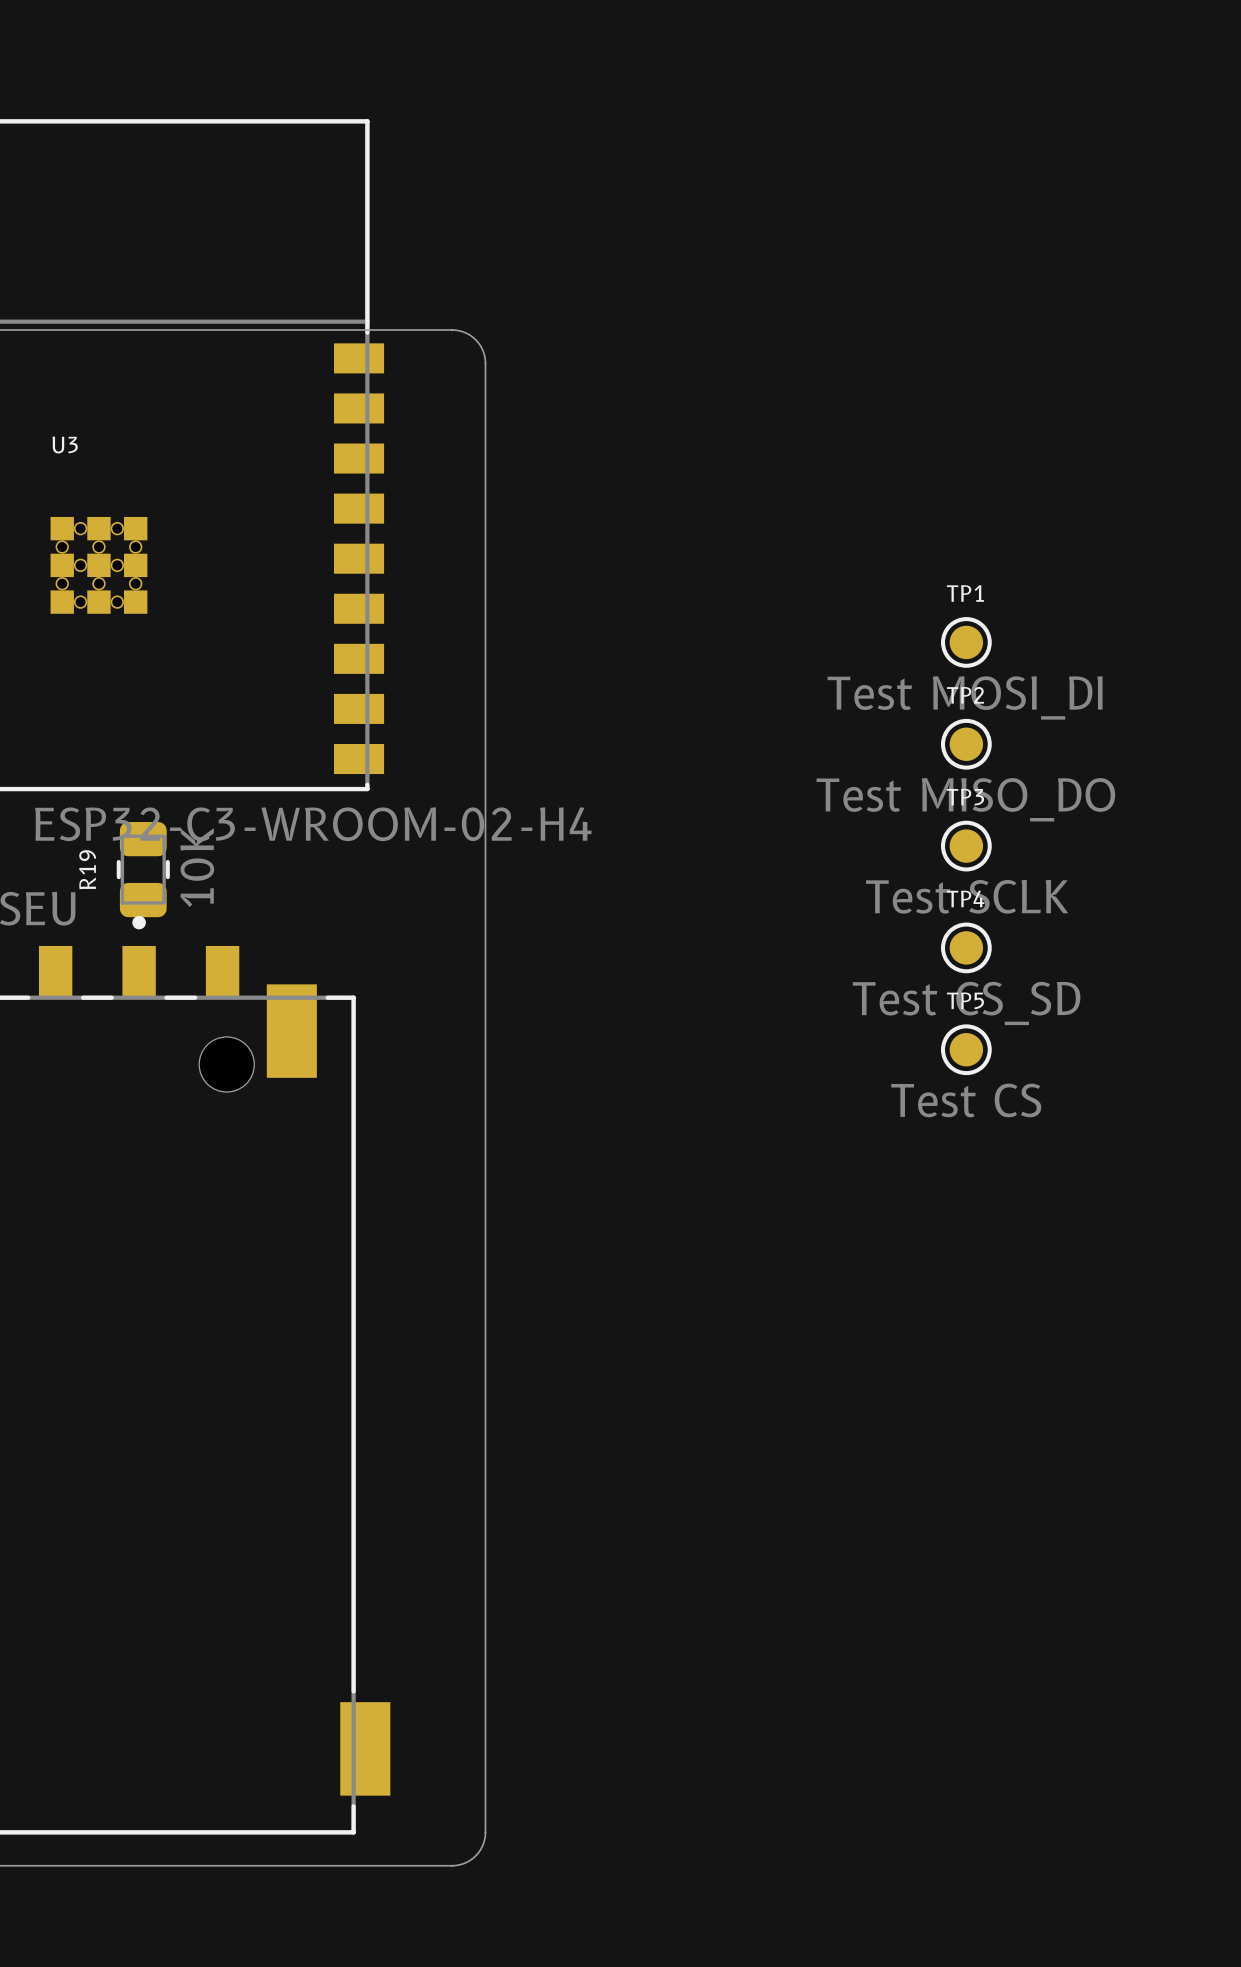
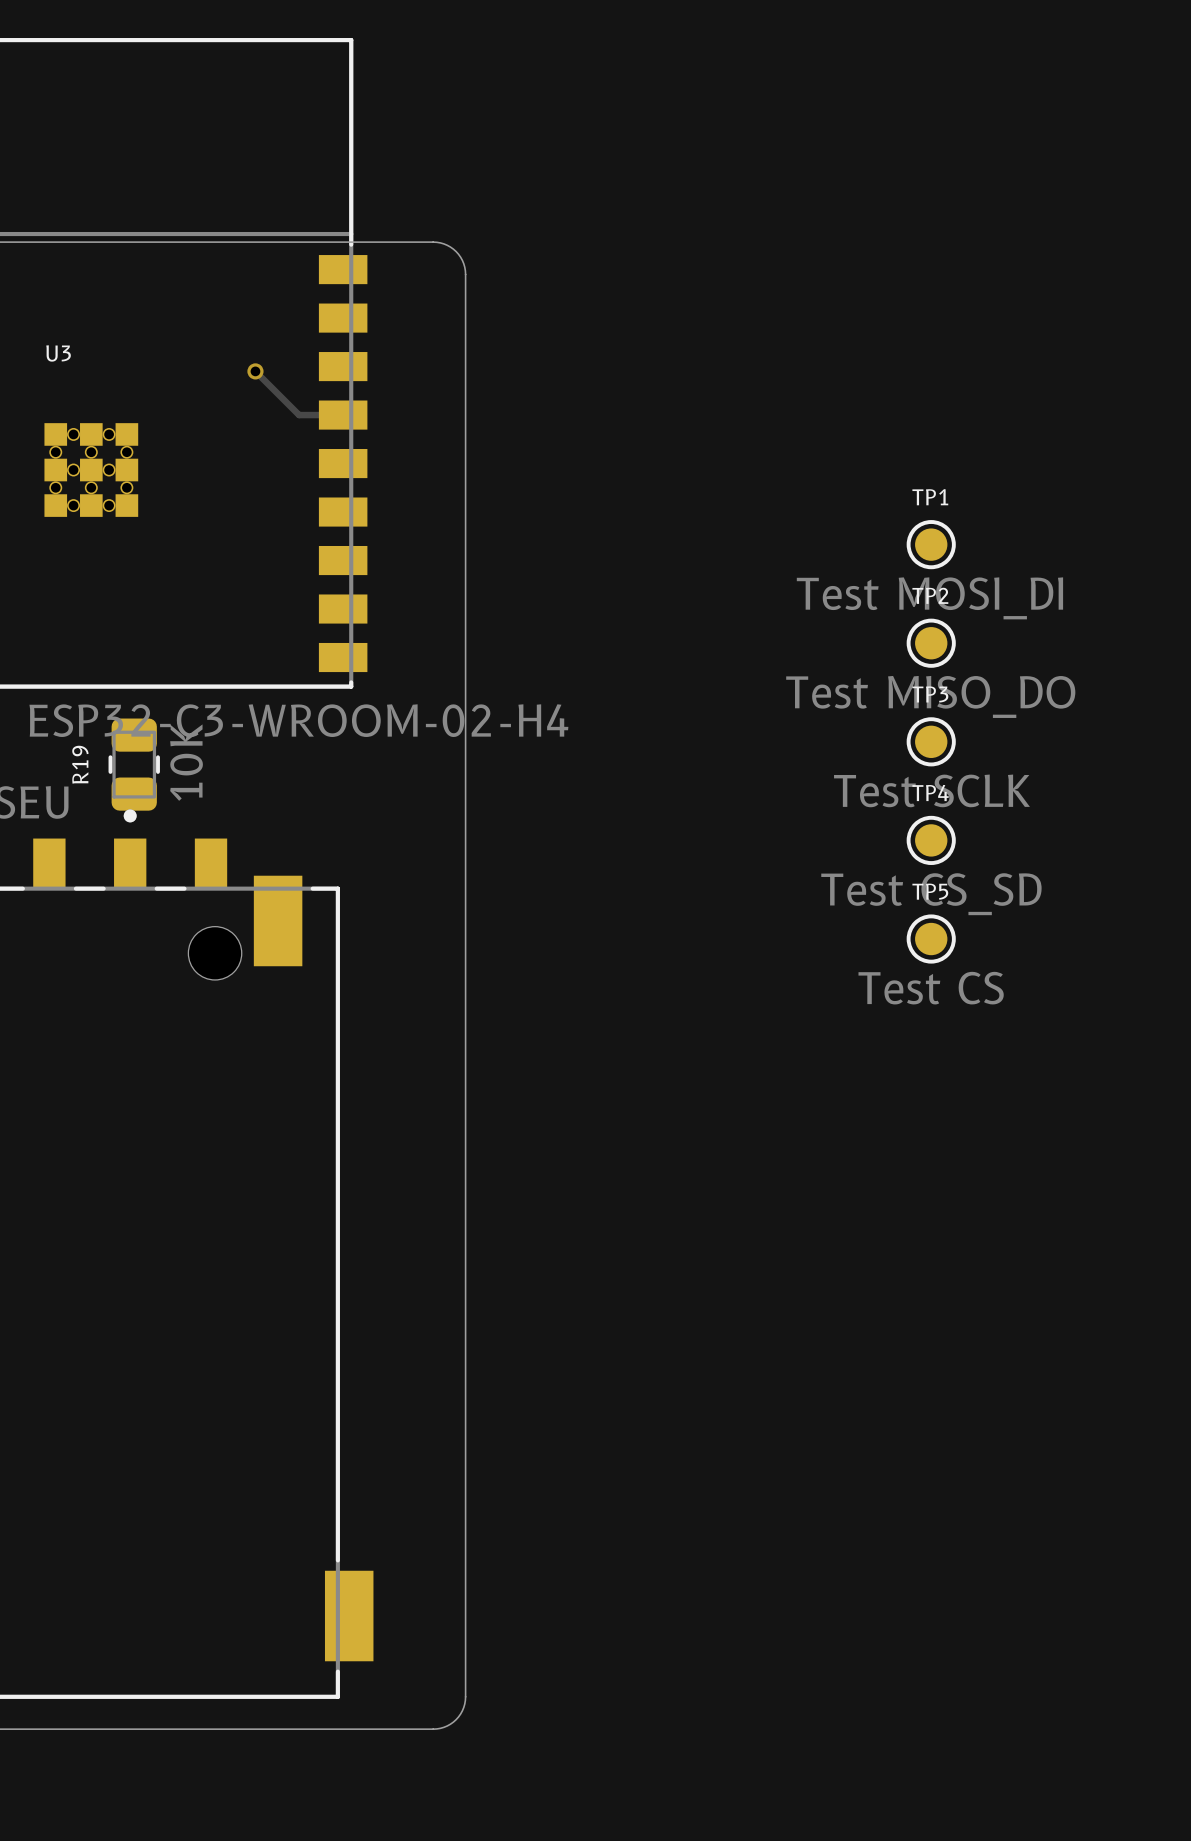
track: none -> (255, 371) (299, 415) (343, 415)
via: none -> (255, 371)

